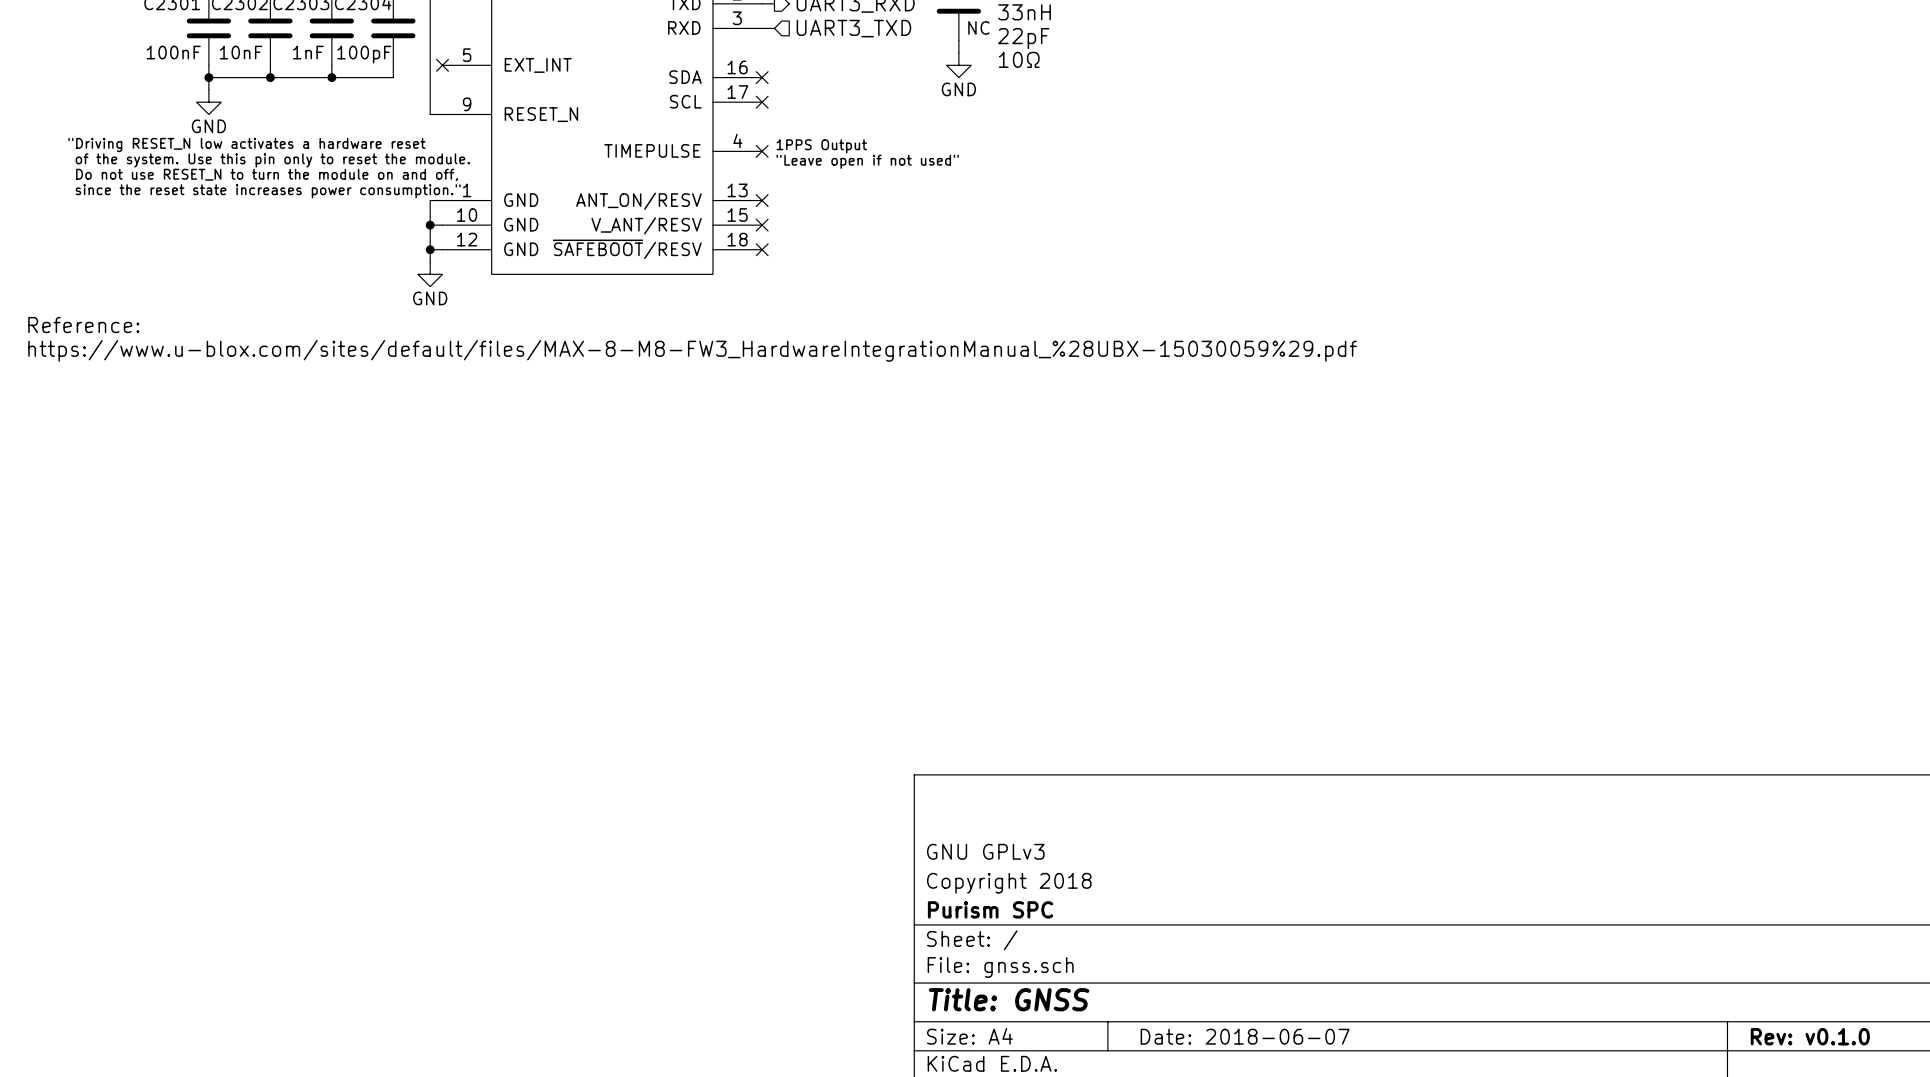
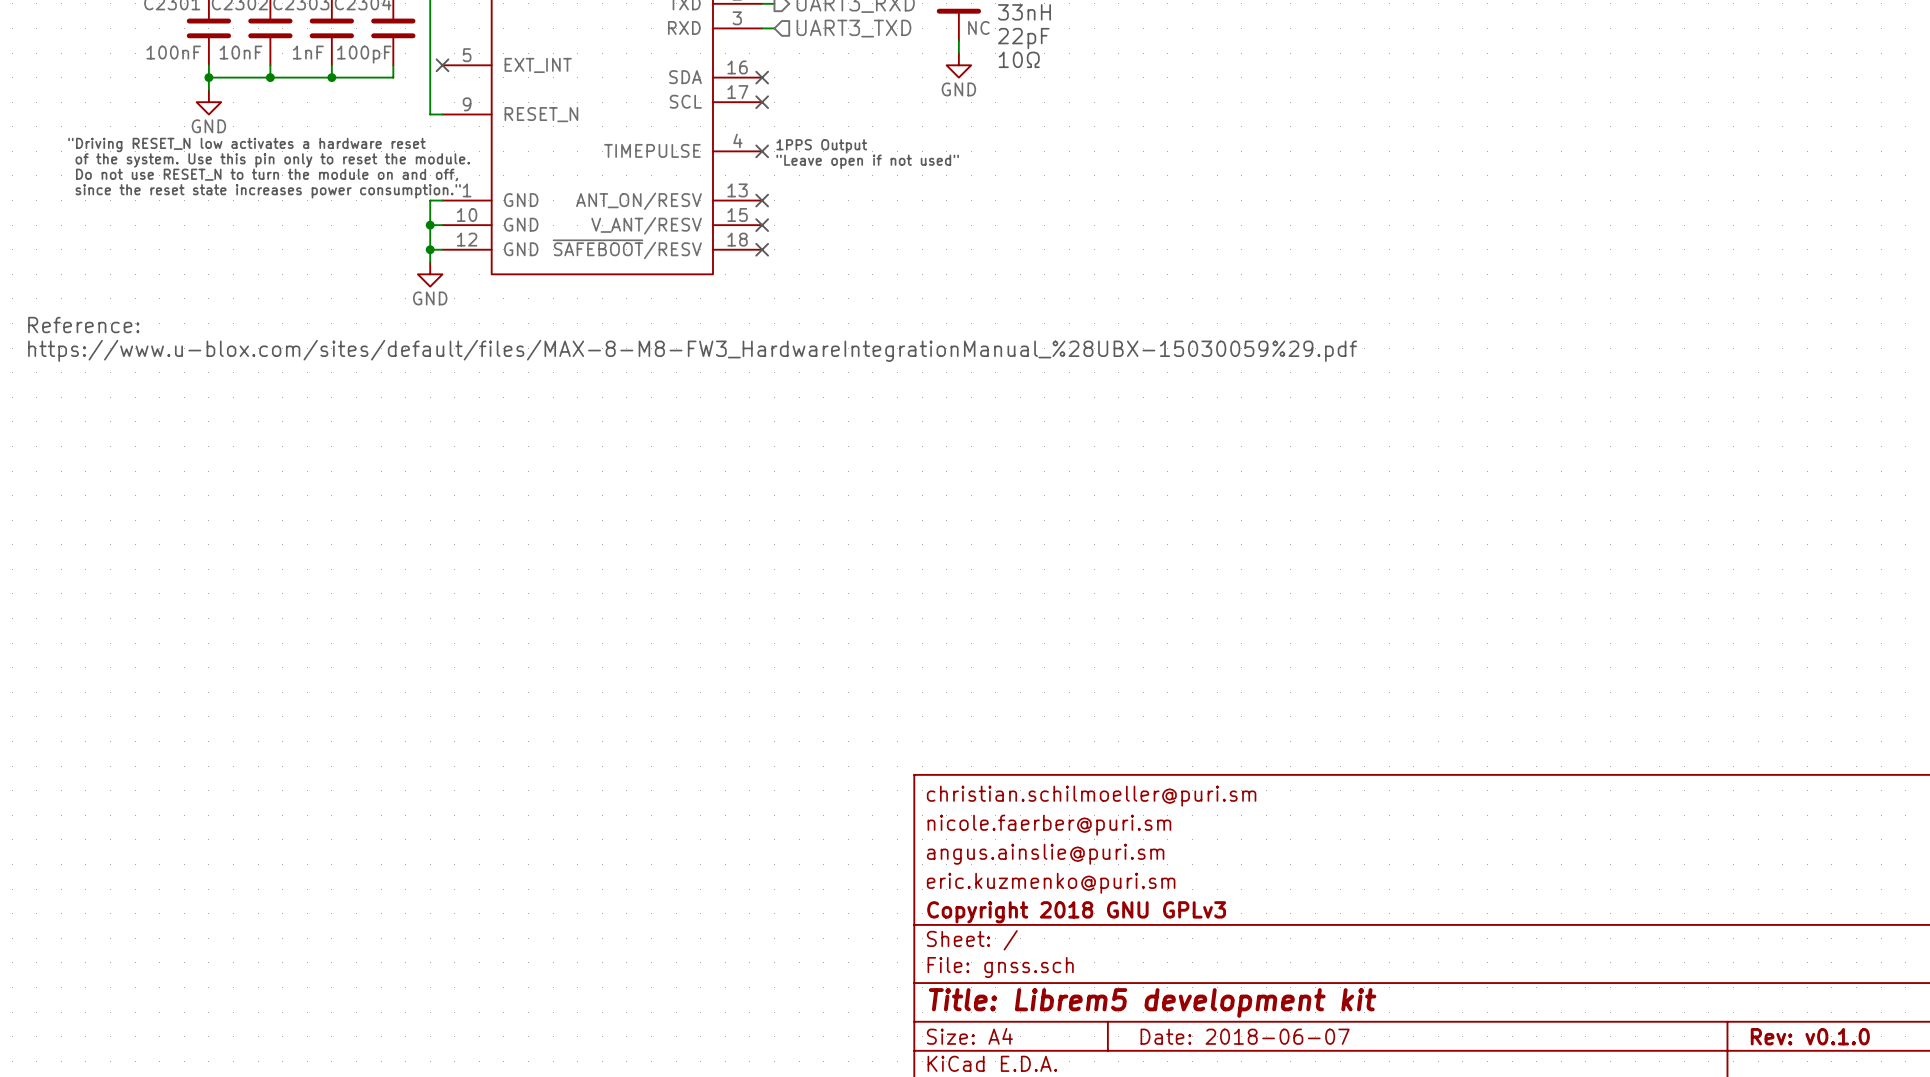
title block: none -> christian.schilmoeller@puri.sm (1091, 796)
title block: none -> nicole.faerber@puri.sm (1049, 825)
title block: GNU GPLv3 (985, 851) -> angus.ainslie@puri.sm (1045, 854)
title block: Copyright 2018 (1009, 883) -> eric.kuzmenko@puri.sm (1051, 883)
title block: Purism SPC (990, 909) -> Copyright 2018 GNU GPLv3 (1076, 912)
title block: Title: GNSS (1009, 999) -> Title: Librem5 development kit (1152, 1002)

